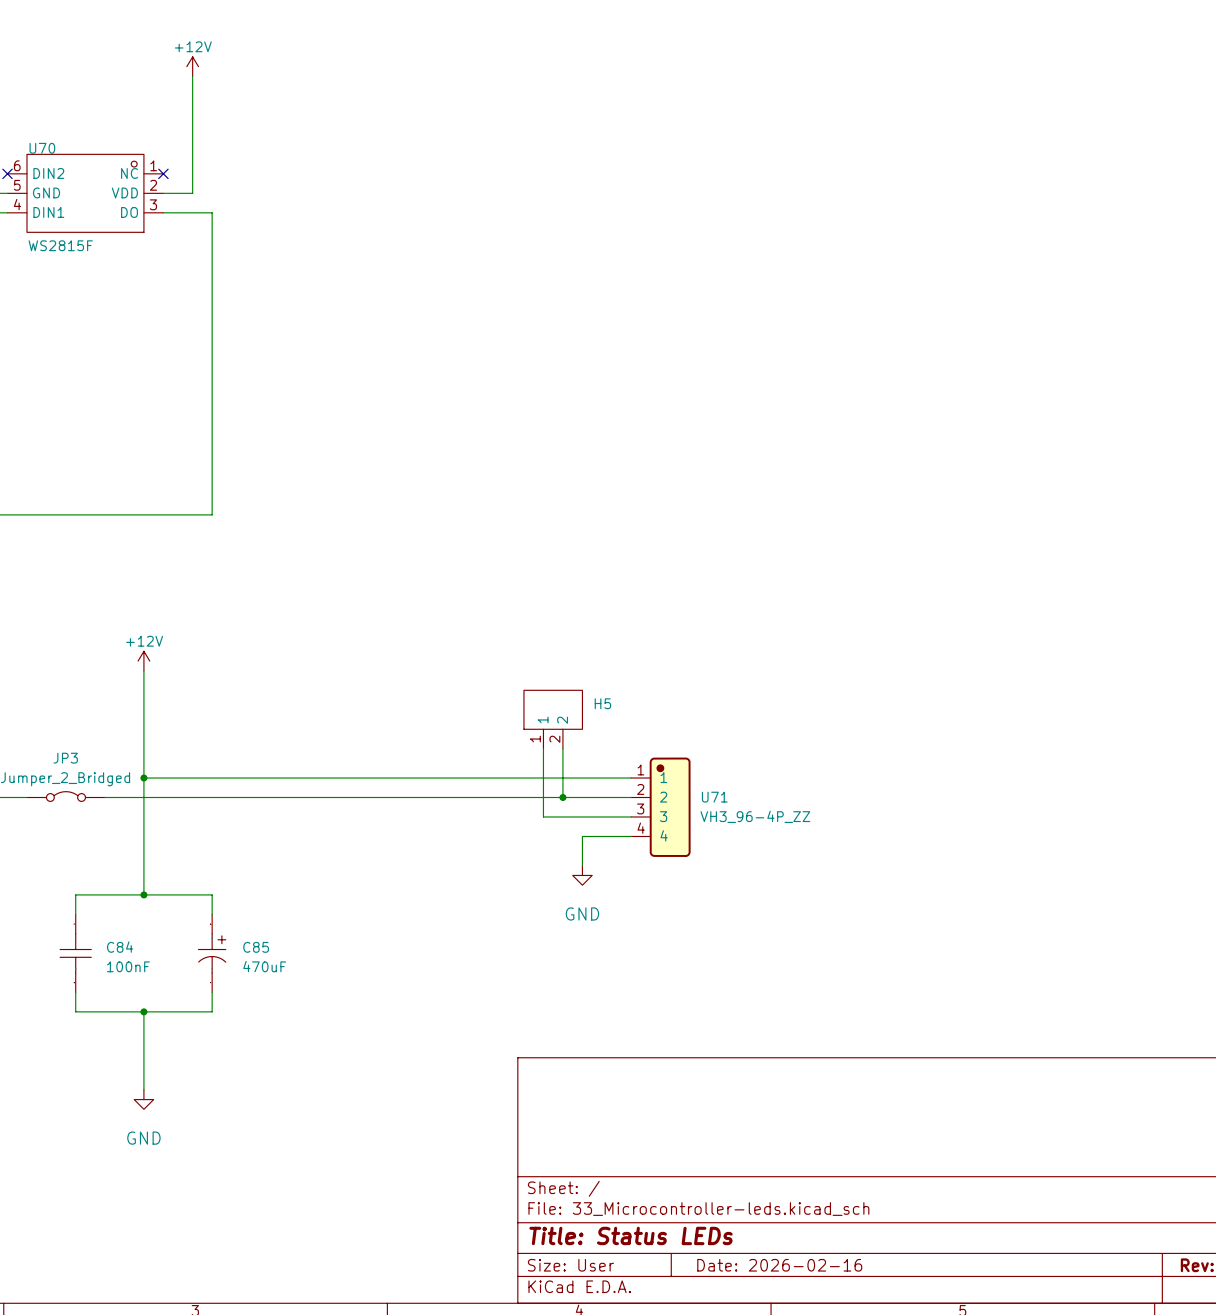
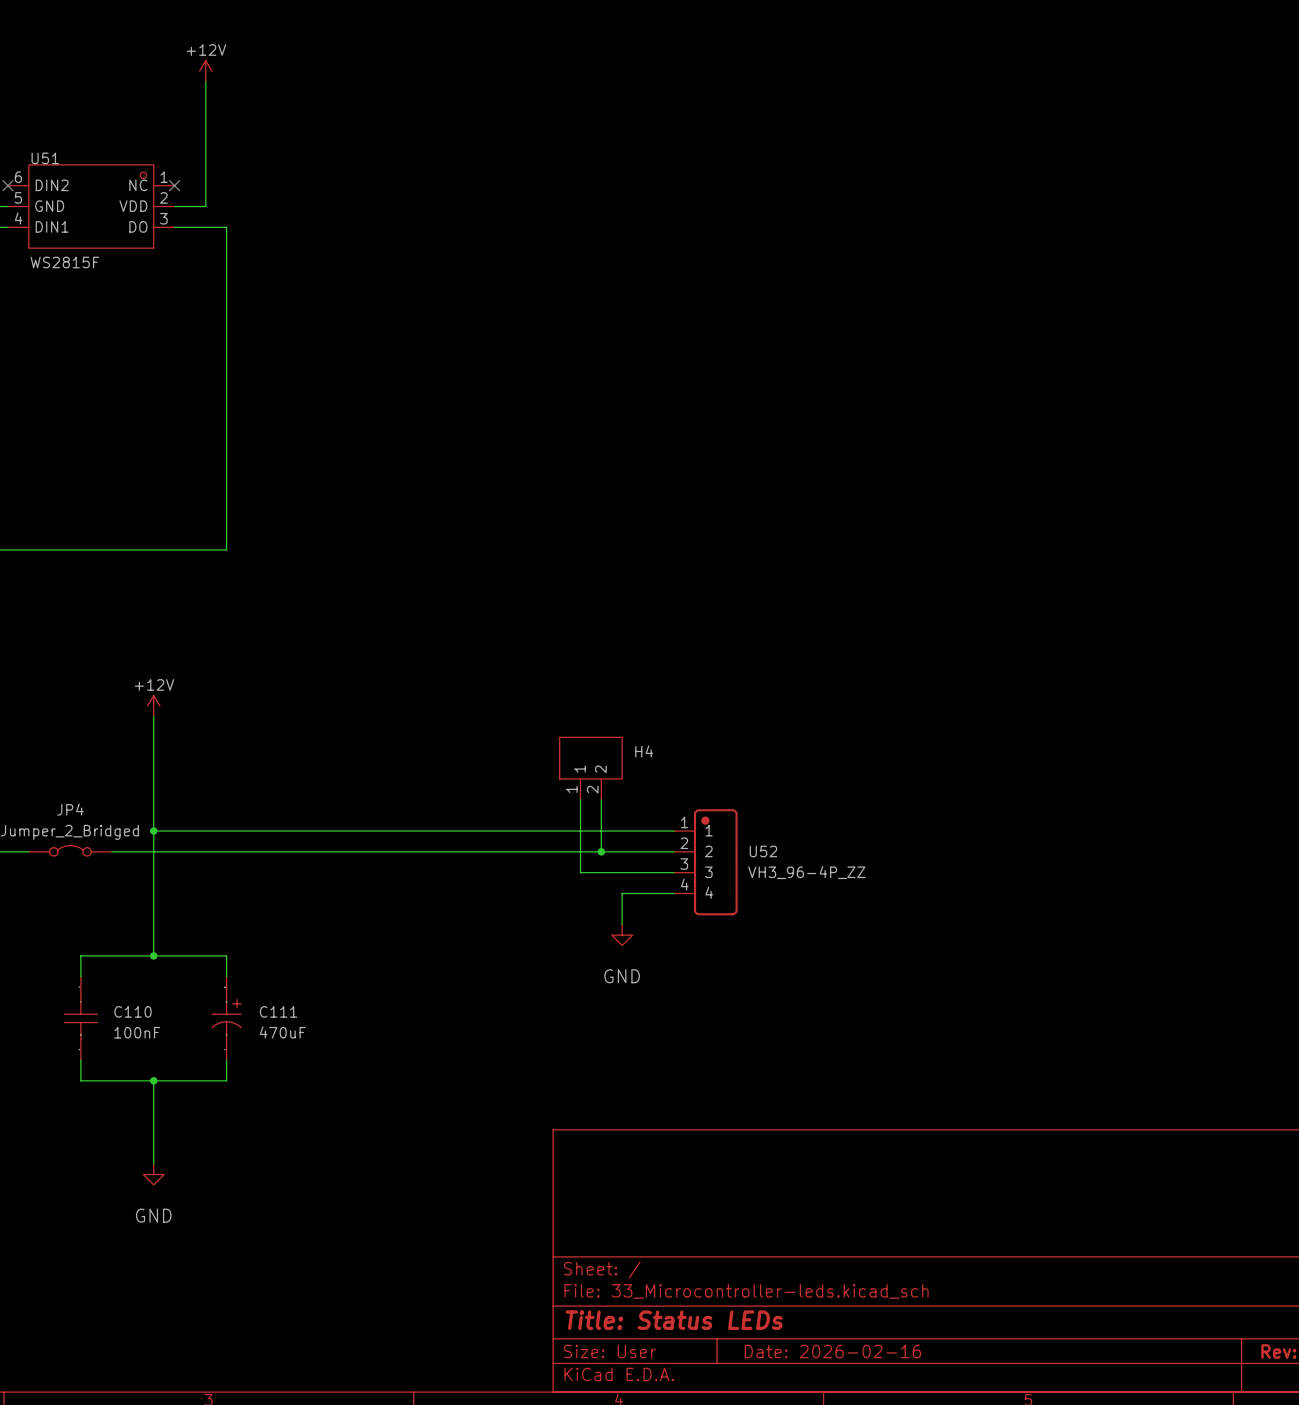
U70 name: U70 (42, 148) -> U51 (45, 158)
H5 name: H5 (602, 703) -> H4 (644, 751)
JP3 name: JP3 (65, 758) -> JP4 (70, 809)
U71 name: U71 (714, 797) -> U52 (763, 851)
C84 name: C84 (120, 947) -> C110 (133, 1011)
C85 name: C85 (256, 947) -> C111 (278, 1011)

